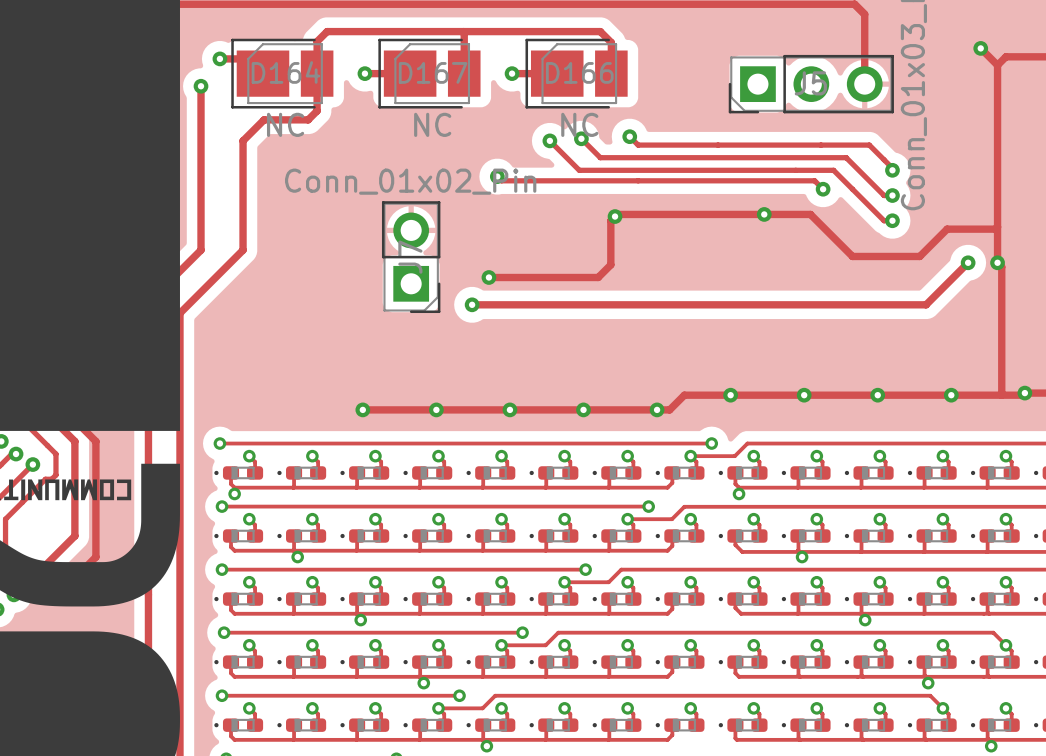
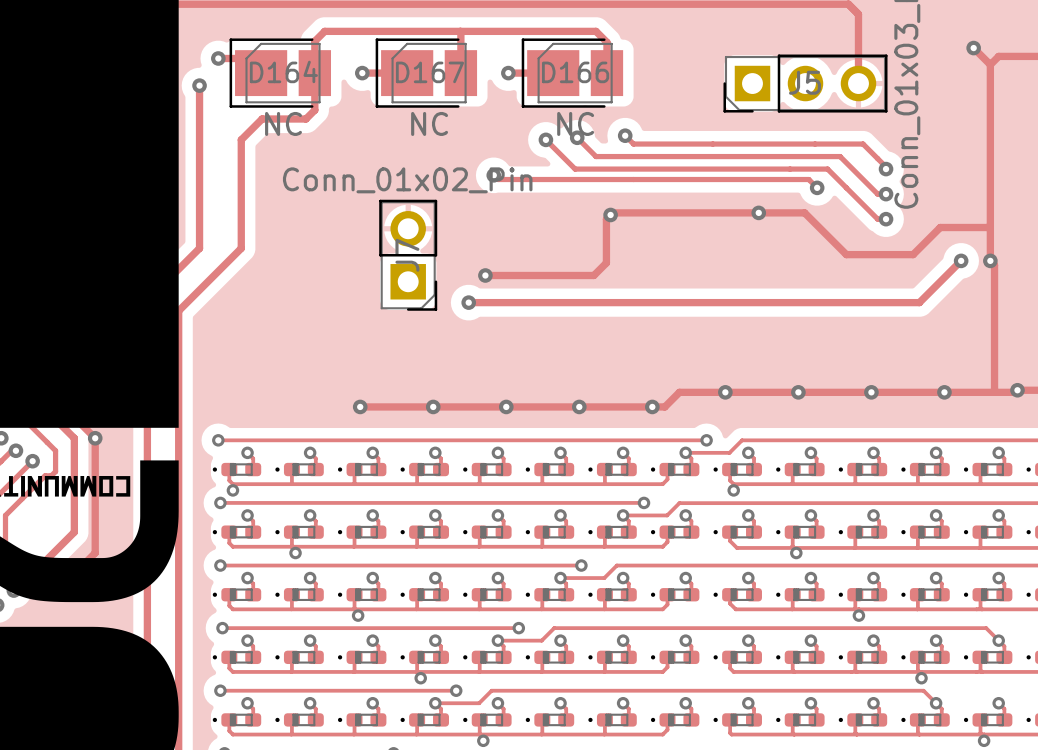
via: none -> (95, 438)

